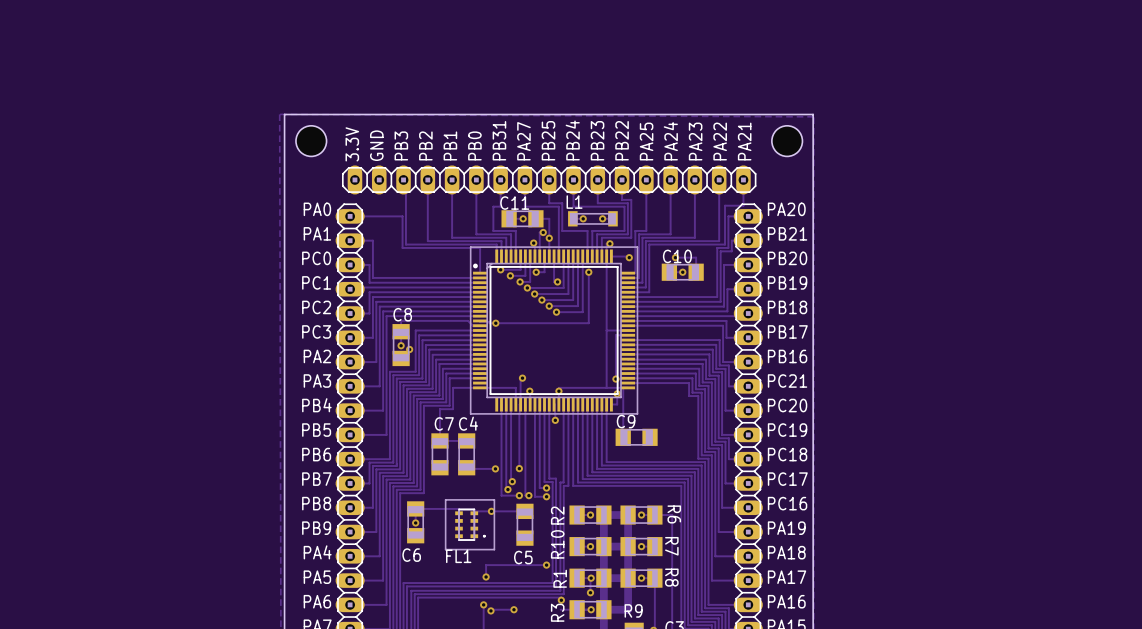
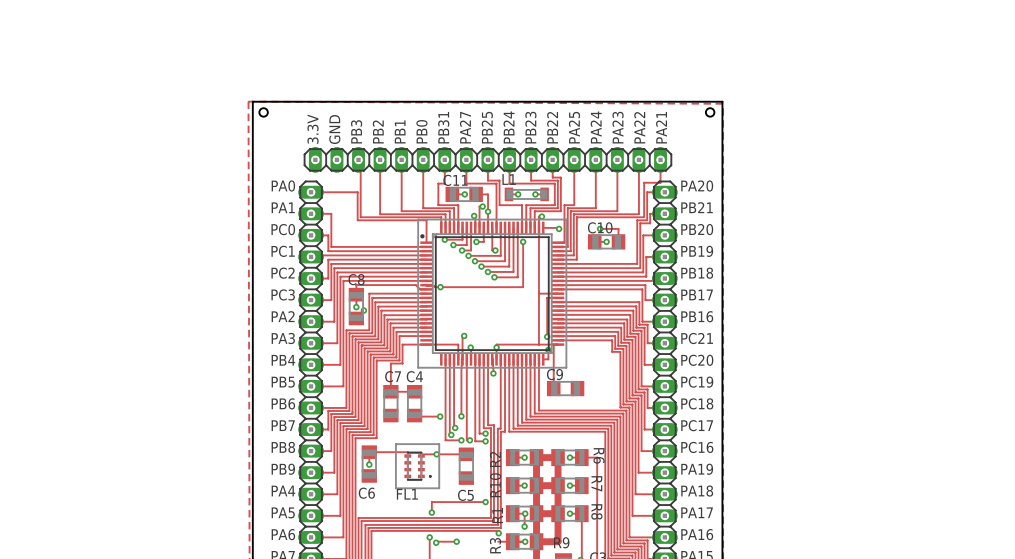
hole: none -> (263, 112)
hole: none -> (710, 112)
hole: (311, 141) -> none
hole: (787, 141) -> none

